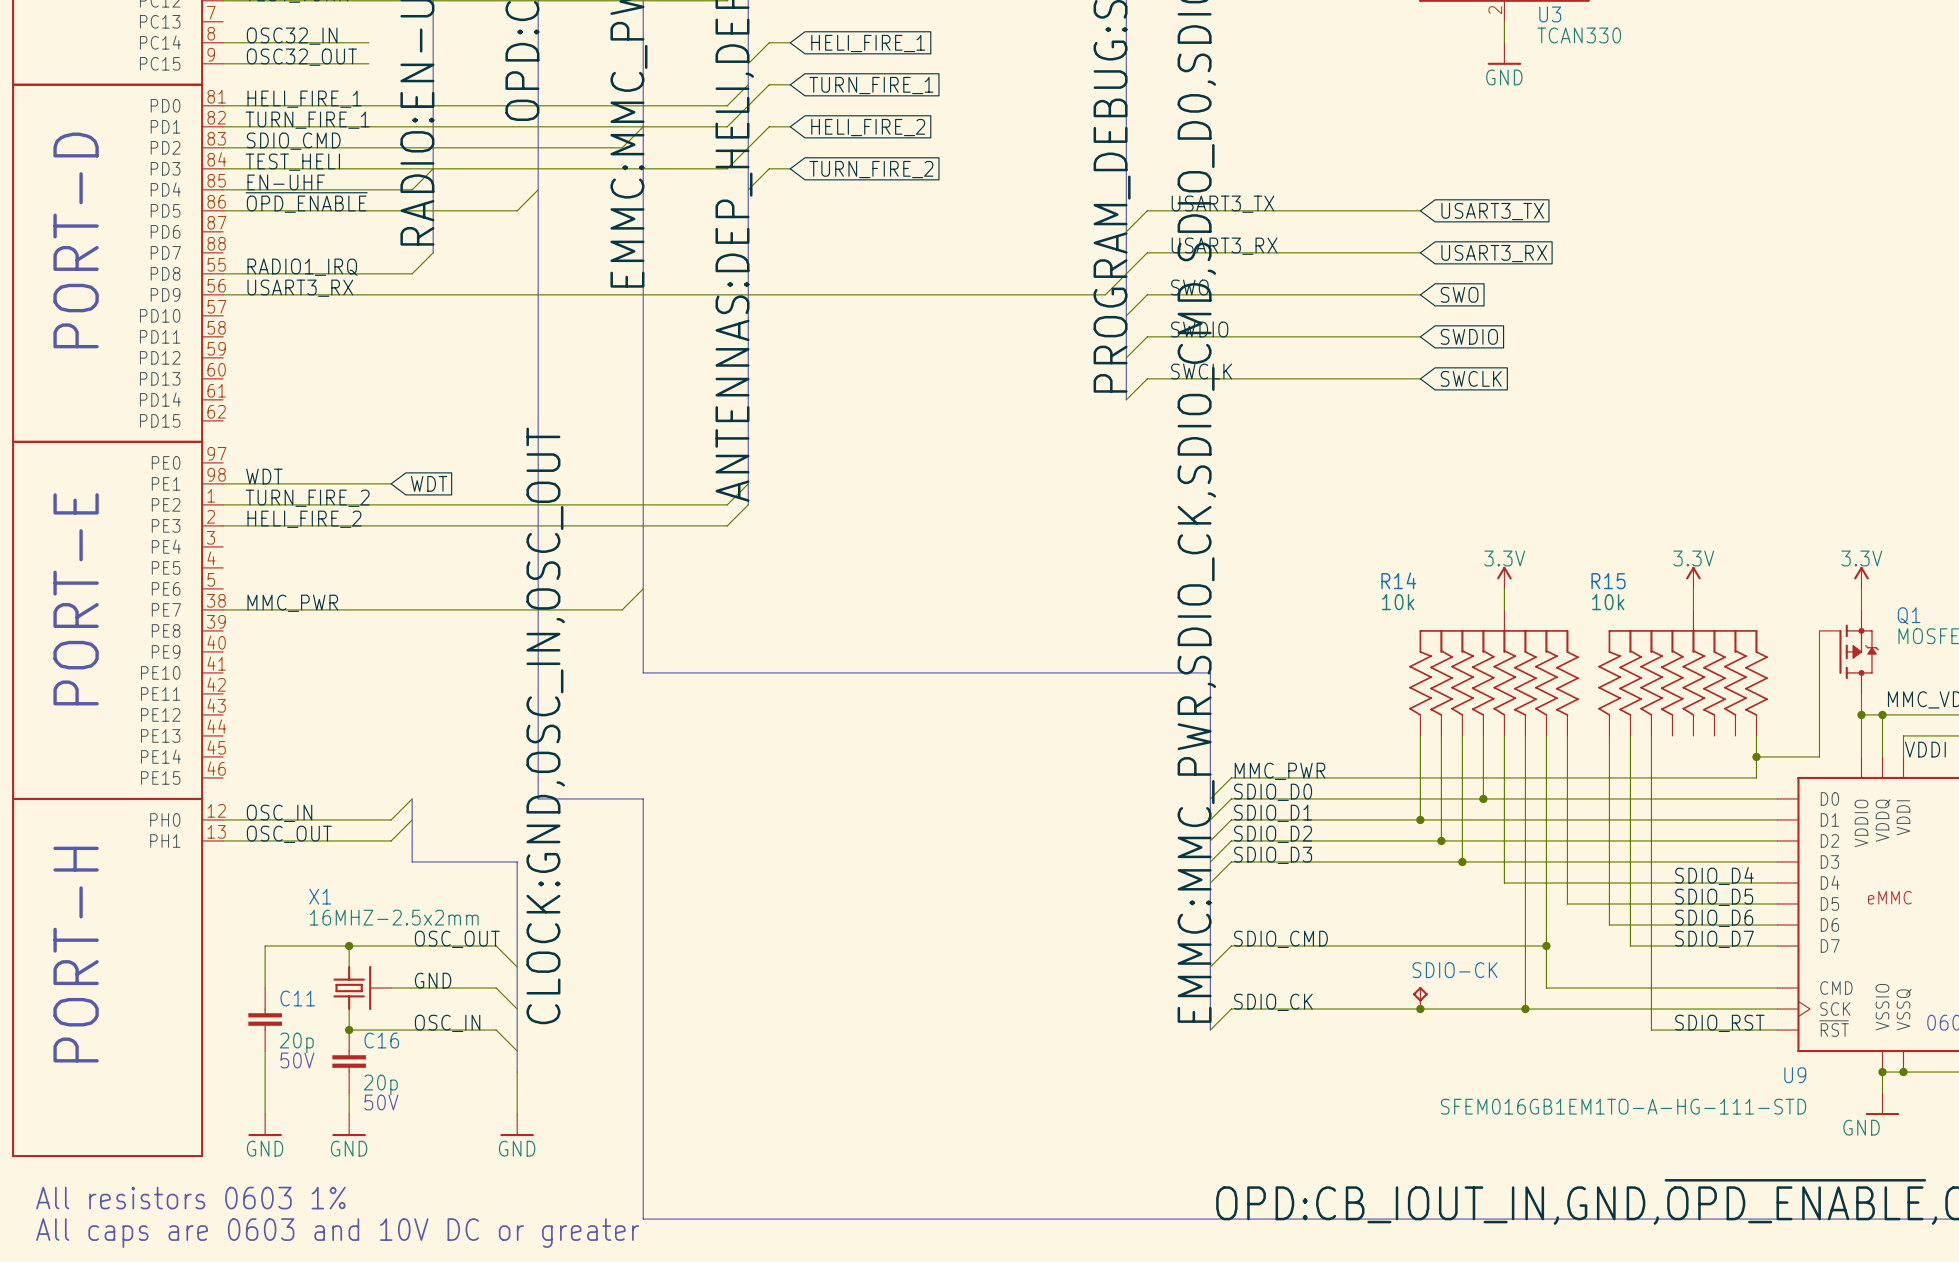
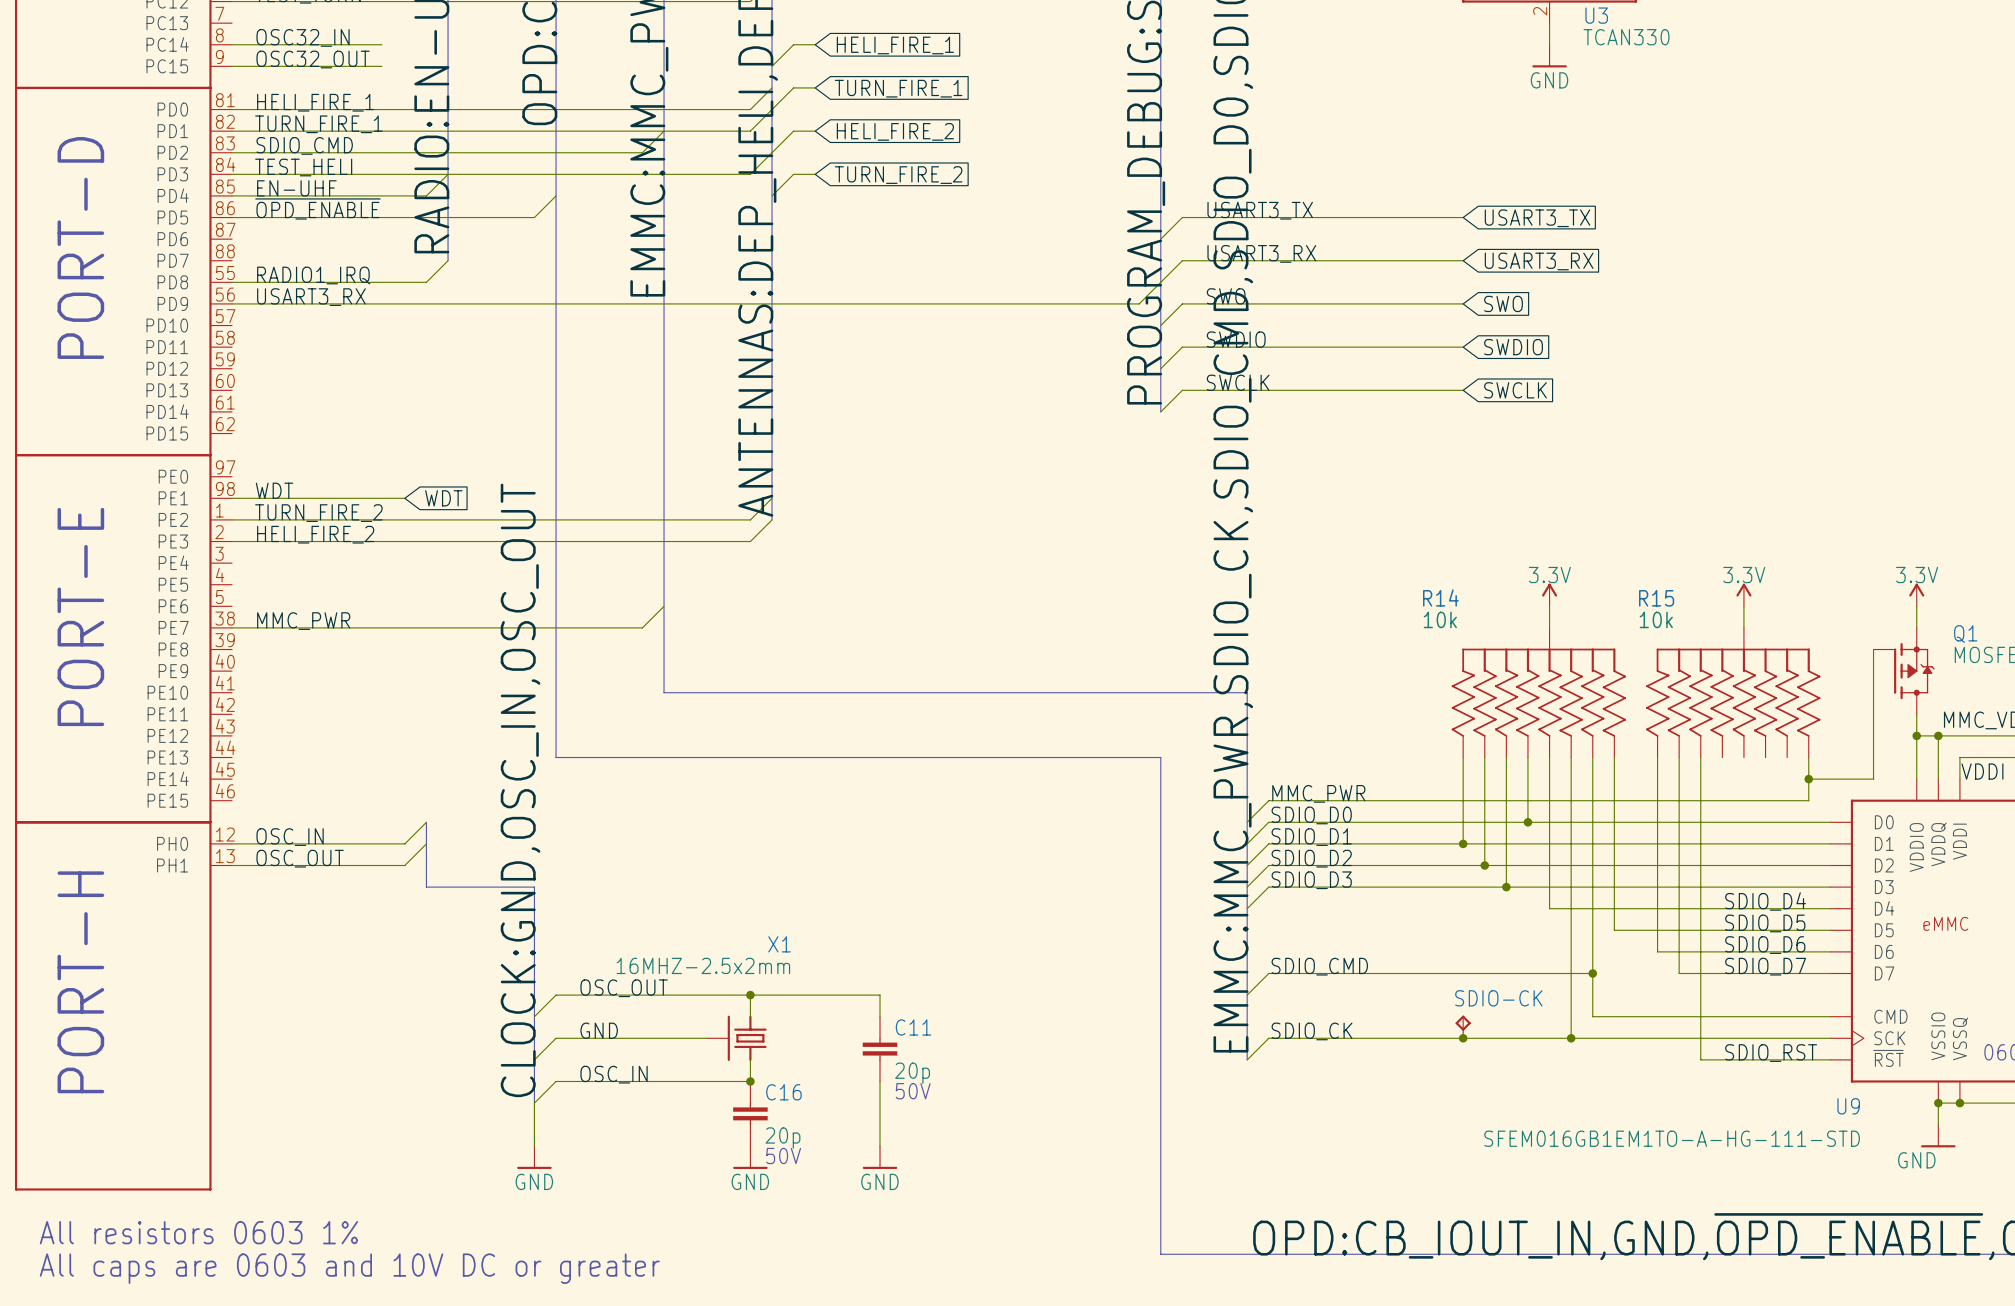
label position: CLOCK:GND,OSC_IN,OSC_OUT (545, 725) -> CLOCK:GND,OSC_IN,OSC_OUT (520, 790)
bus: (538, 735) (538, 798) (643, 798) (643, 1219) (1126, 1219) -> (556, 757) (1160, 757) (1160, 1254)
X1 name position: X1 (320, 896) -> X1 (779, 944)
X1 value position: 16MHZ-2.5x2mm (394, 917) -> 16MHZ-2.5x2mm (703, 965)
label position: OSC_OUT (457, 939) -> OSC_OUT (624, 988)
wire: (349, 946) (349, 967) -> none
junction: (349, 946) -> none
wire: (517, 967) (496, 946) (265, 946) (265, 988) -> none
wire: none -> (750, 995) (750, 1016)
junction: none -> (750, 995)
label position: GND (433, 980) -> GND (599, 1030)
X1 rotation: 0° (352, 988) -> 180° (747, 1038)
X1 position: (362, 988) -> (736, 1038)
wire: (391, 988) (496, 988) (517, 1009) -> none
wire: none -> (534, 1016) (556, 995) (880, 995) (880, 1016)
wire: (349, 1009) (349, 1030) (496, 1030) (517, 1051) -> none
wire: none -> (707, 1038) (556, 1038) (534, 1059)
C11 position: (265, 1019) -> (880, 1049)
label position: OSC_IN (447, 1023) -> OSC_IN (614, 1074)
junction: (349, 1030) -> none
wire: none -> (750, 1059) (750, 1081) (556, 1081) (534, 1103)
wire: (265, 1051) (265, 1114) -> none
junction: none -> (750, 1081)
wire: none -> (880, 1081) (880, 1146)
C16 position: (349, 1061) -> (750, 1113)
wire: (349, 1093) (349, 1114) -> none
power symbol: GND (265, 1125) -> none
power symbol: GND (349, 1125) -> none
power symbol: none -> GND (750, 1157)
power symbol: none -> GND (880, 1157)

